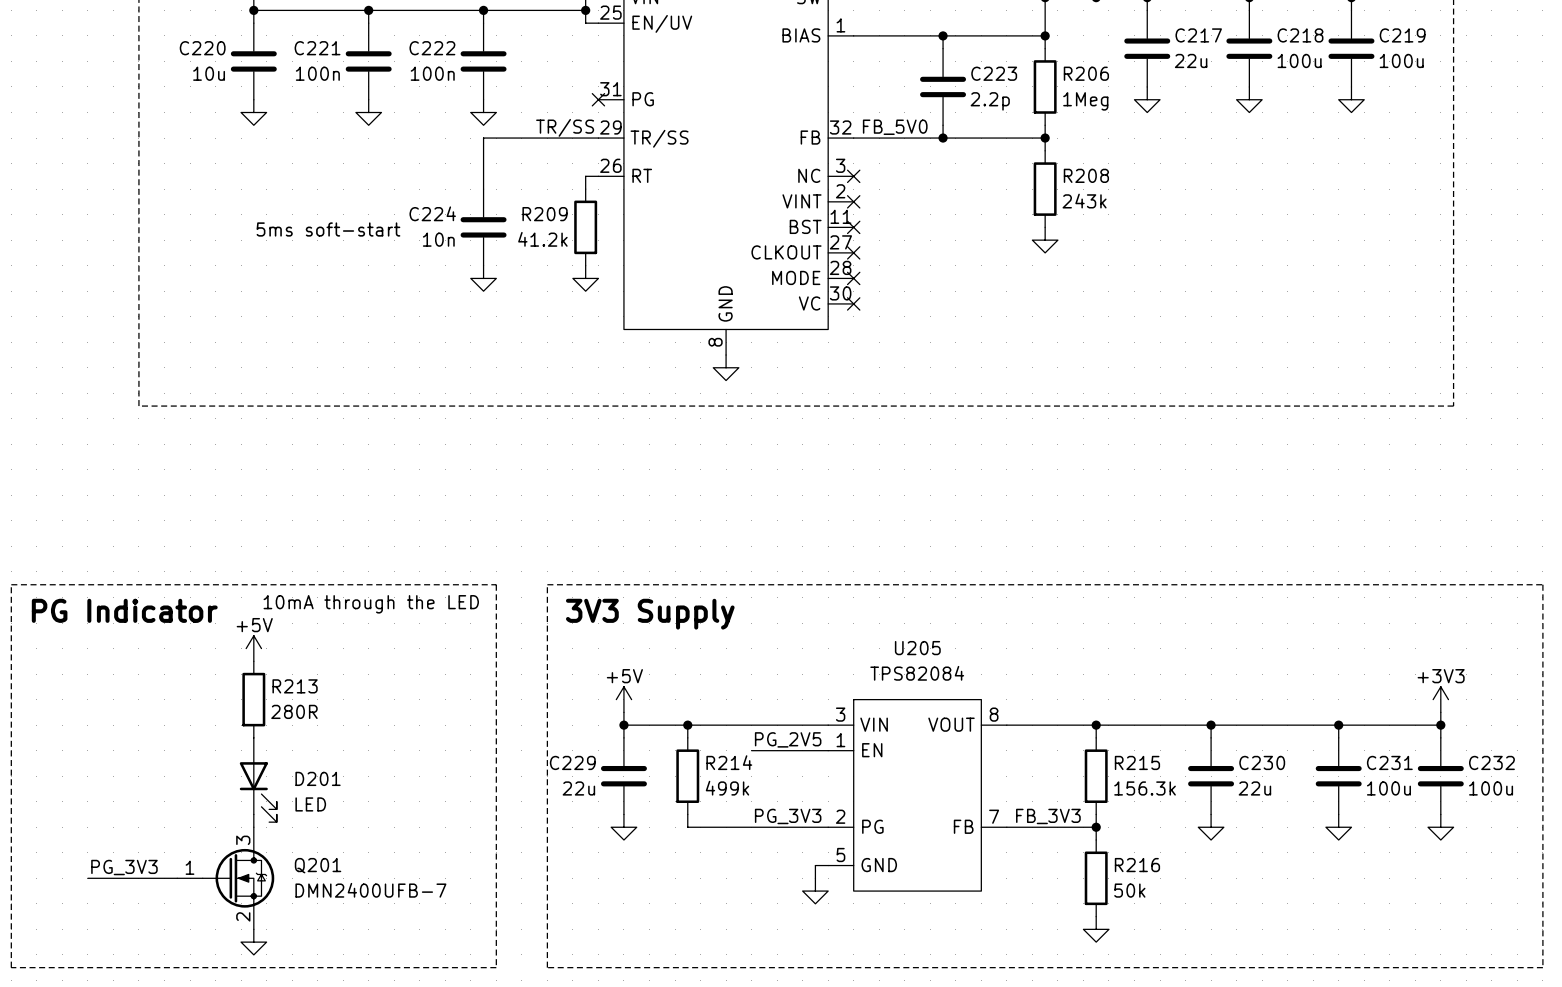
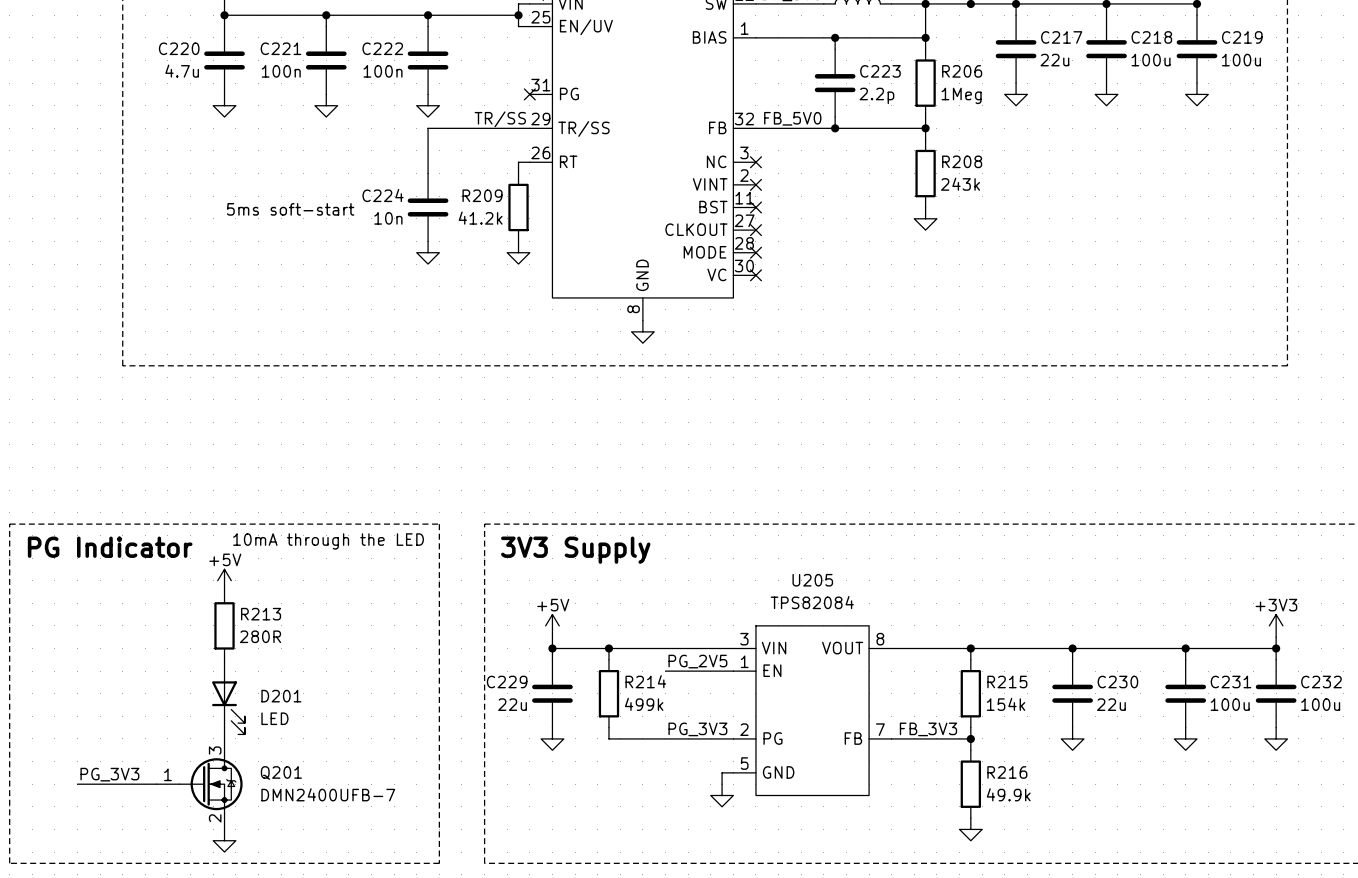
C220 value: 10u (209, 73) -> 4.7u (182, 71)
R215 value: 156.3k (1145, 788) -> 154k (1006, 704)
R216 value: 50k (1129, 890) -> 49.9k (1008, 794)

